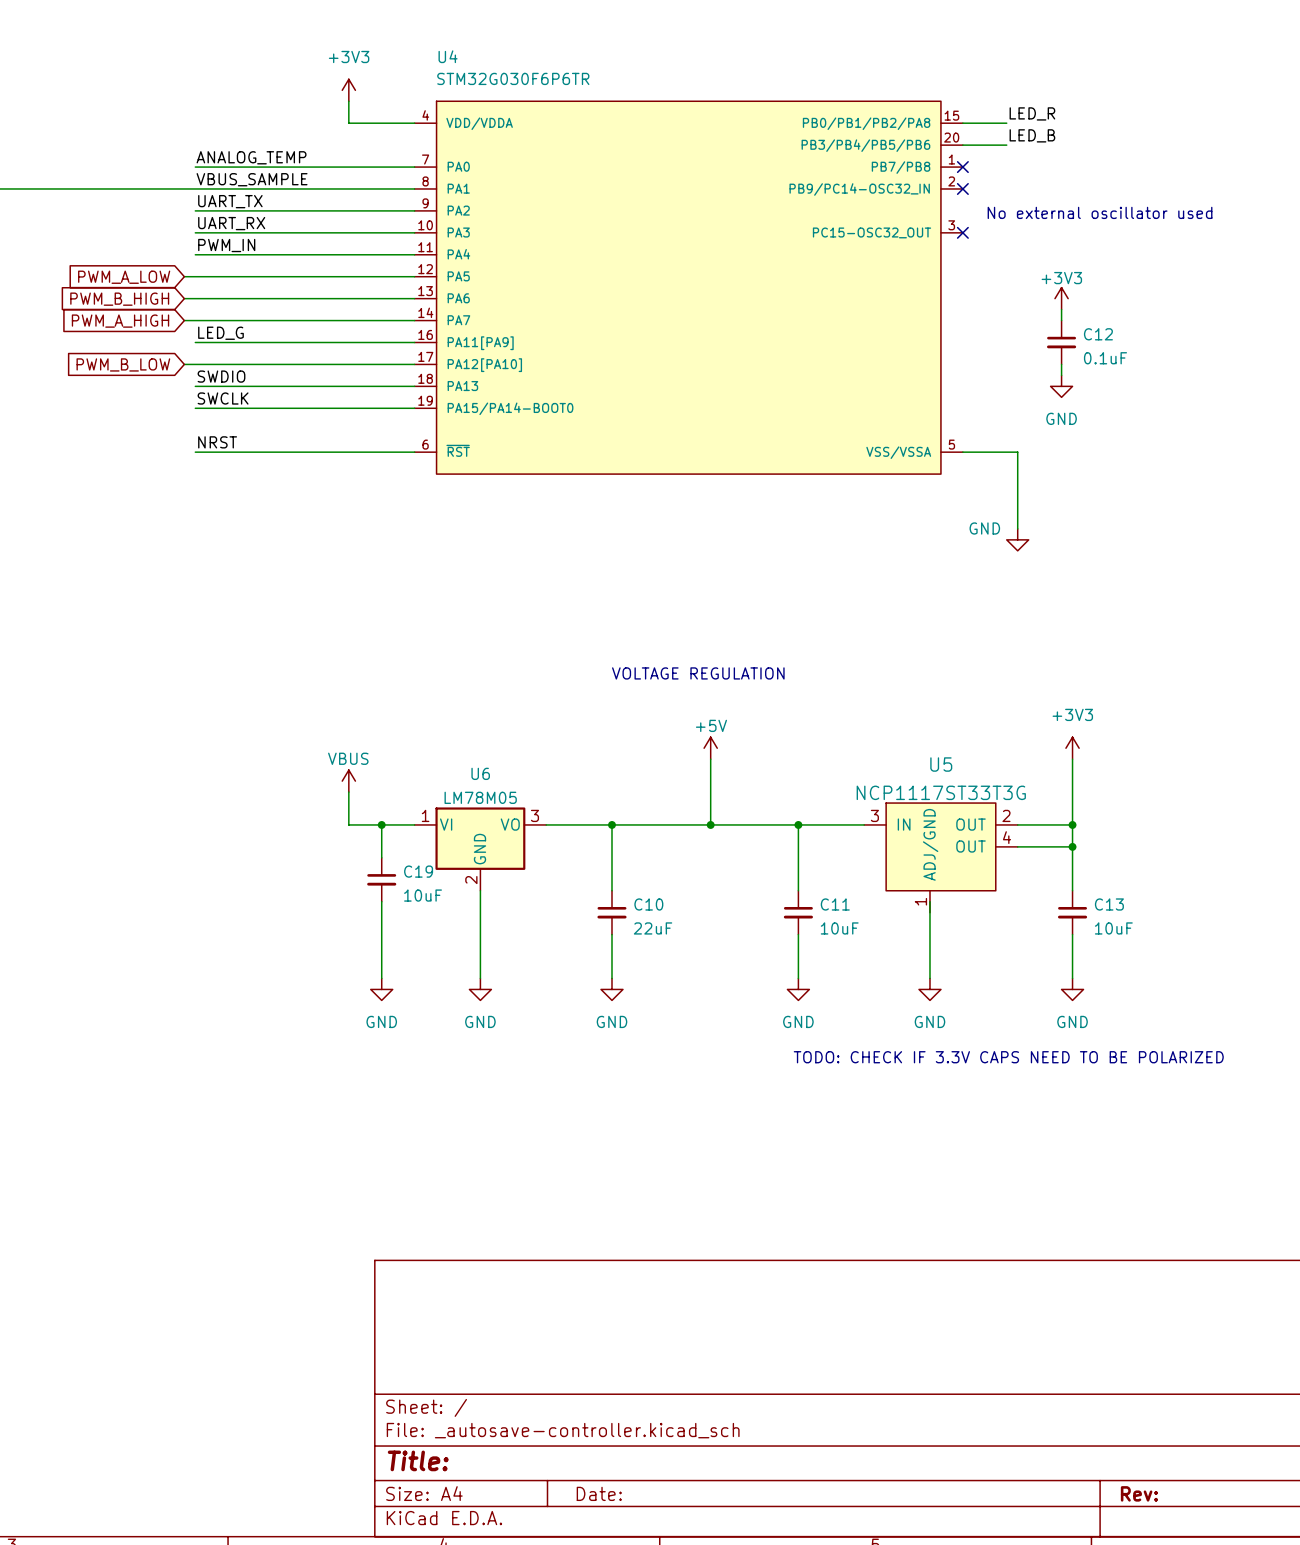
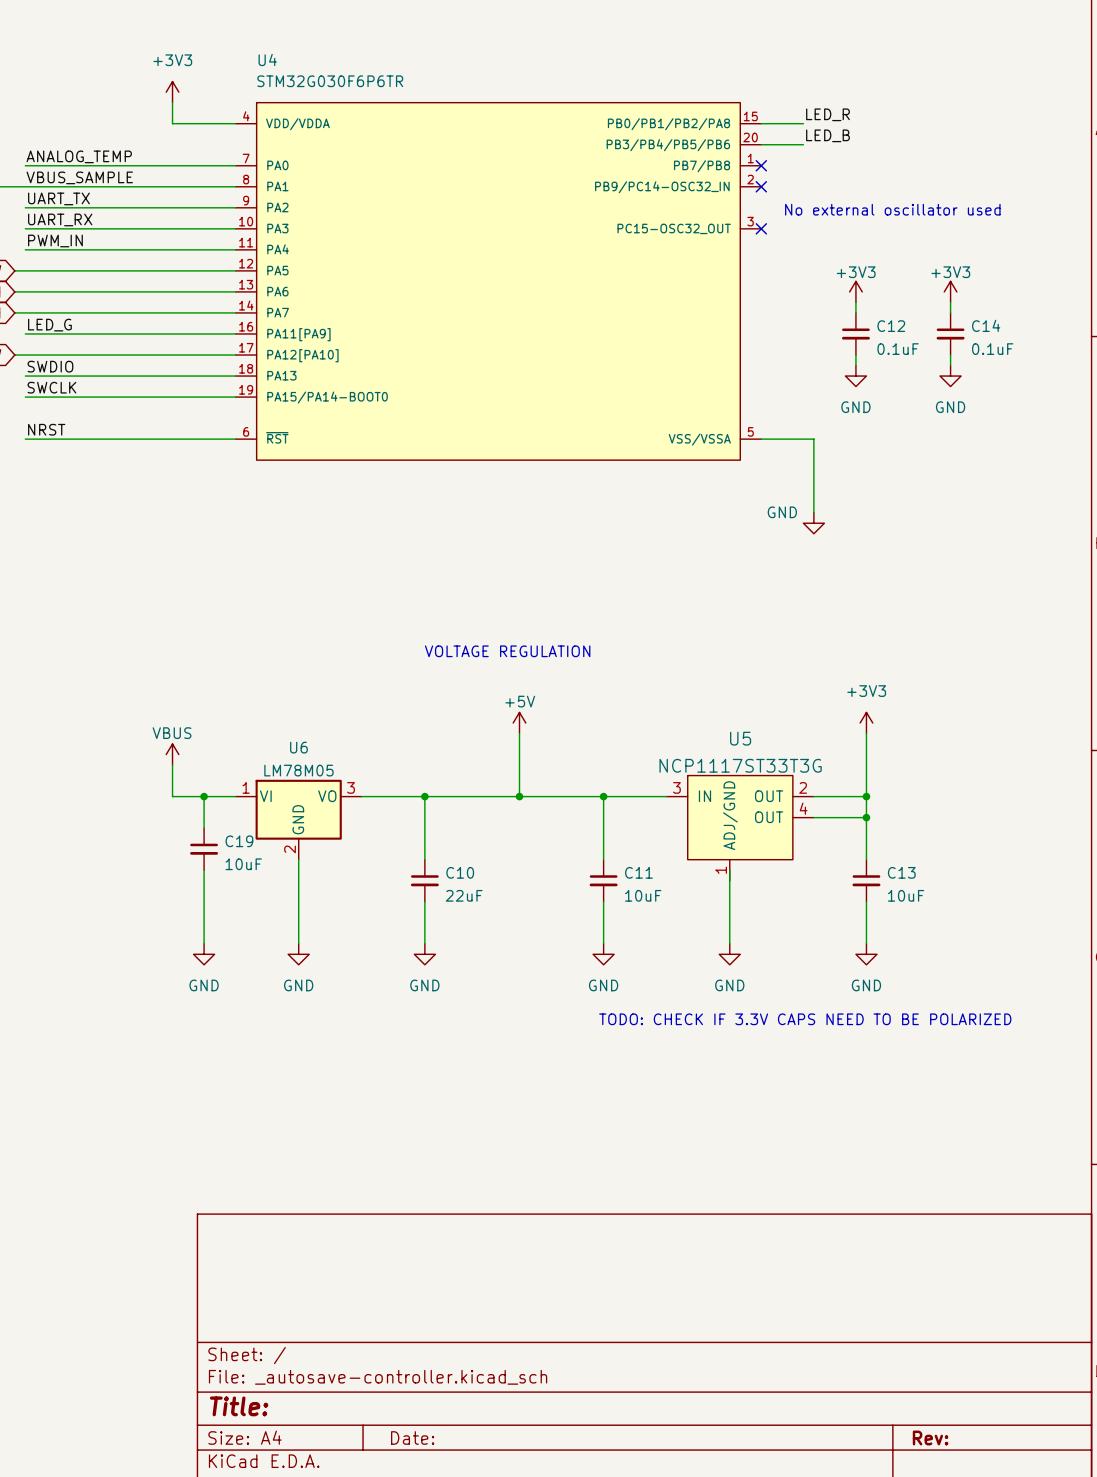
power symbol: none -> +3V3 (950, 291)
wire: none -> (950, 302) (950, 312)
C14: none -> 0.1uF (950, 333)
wire: none -> (950, 355) (950, 365)
power symbol: none -> GND (950, 376)

